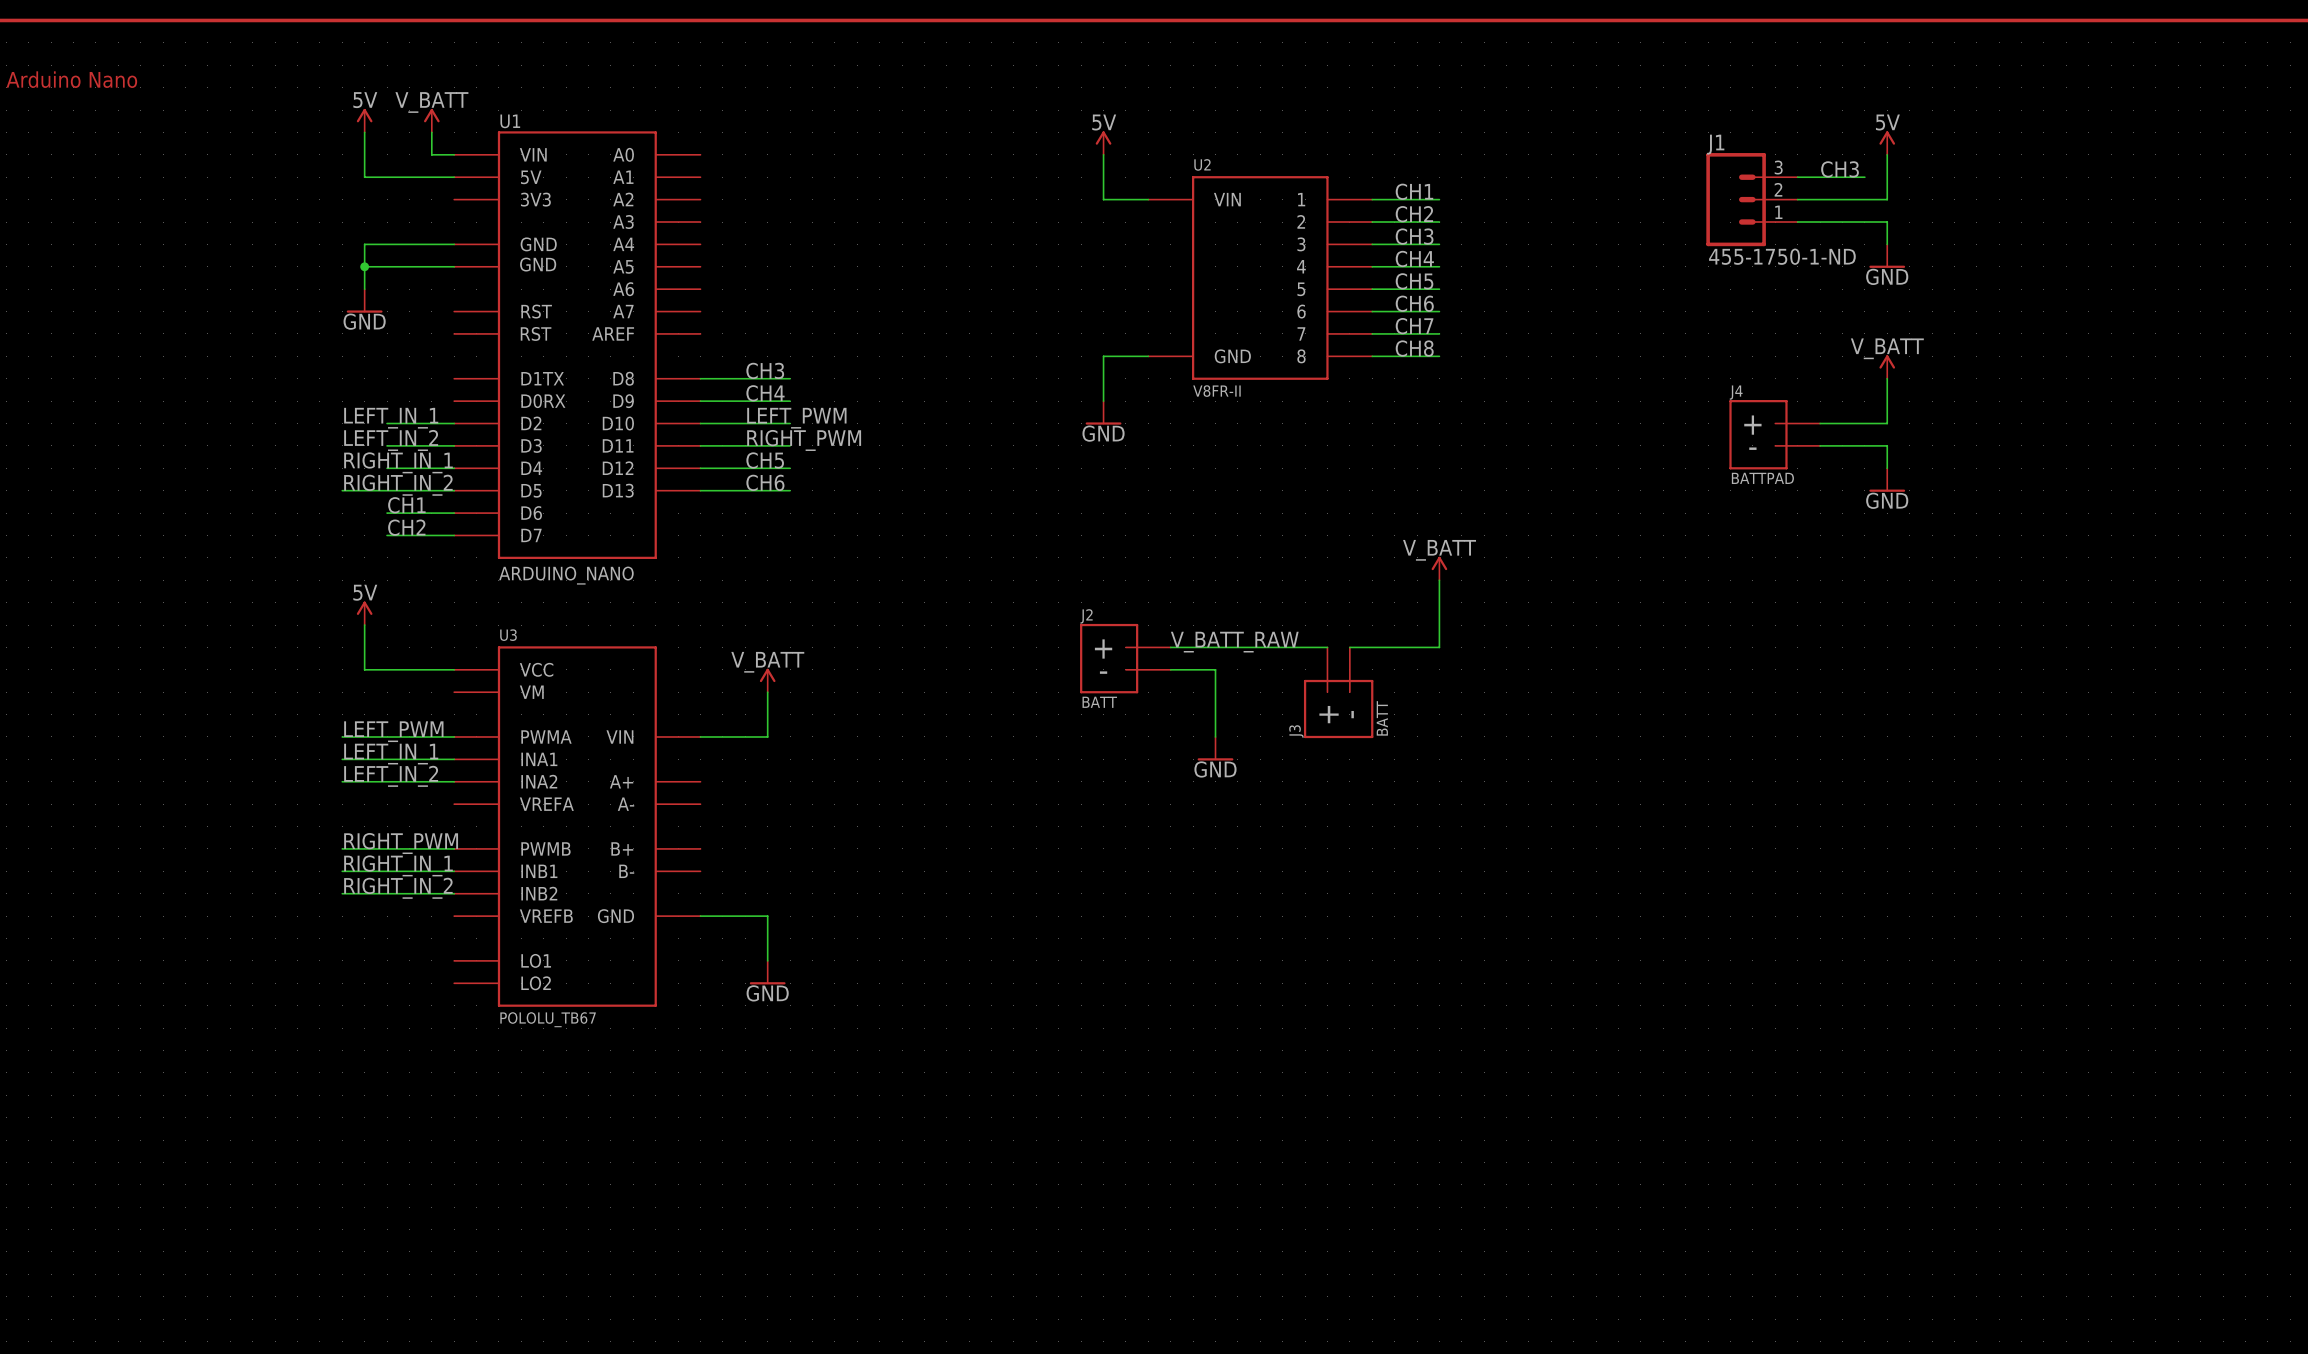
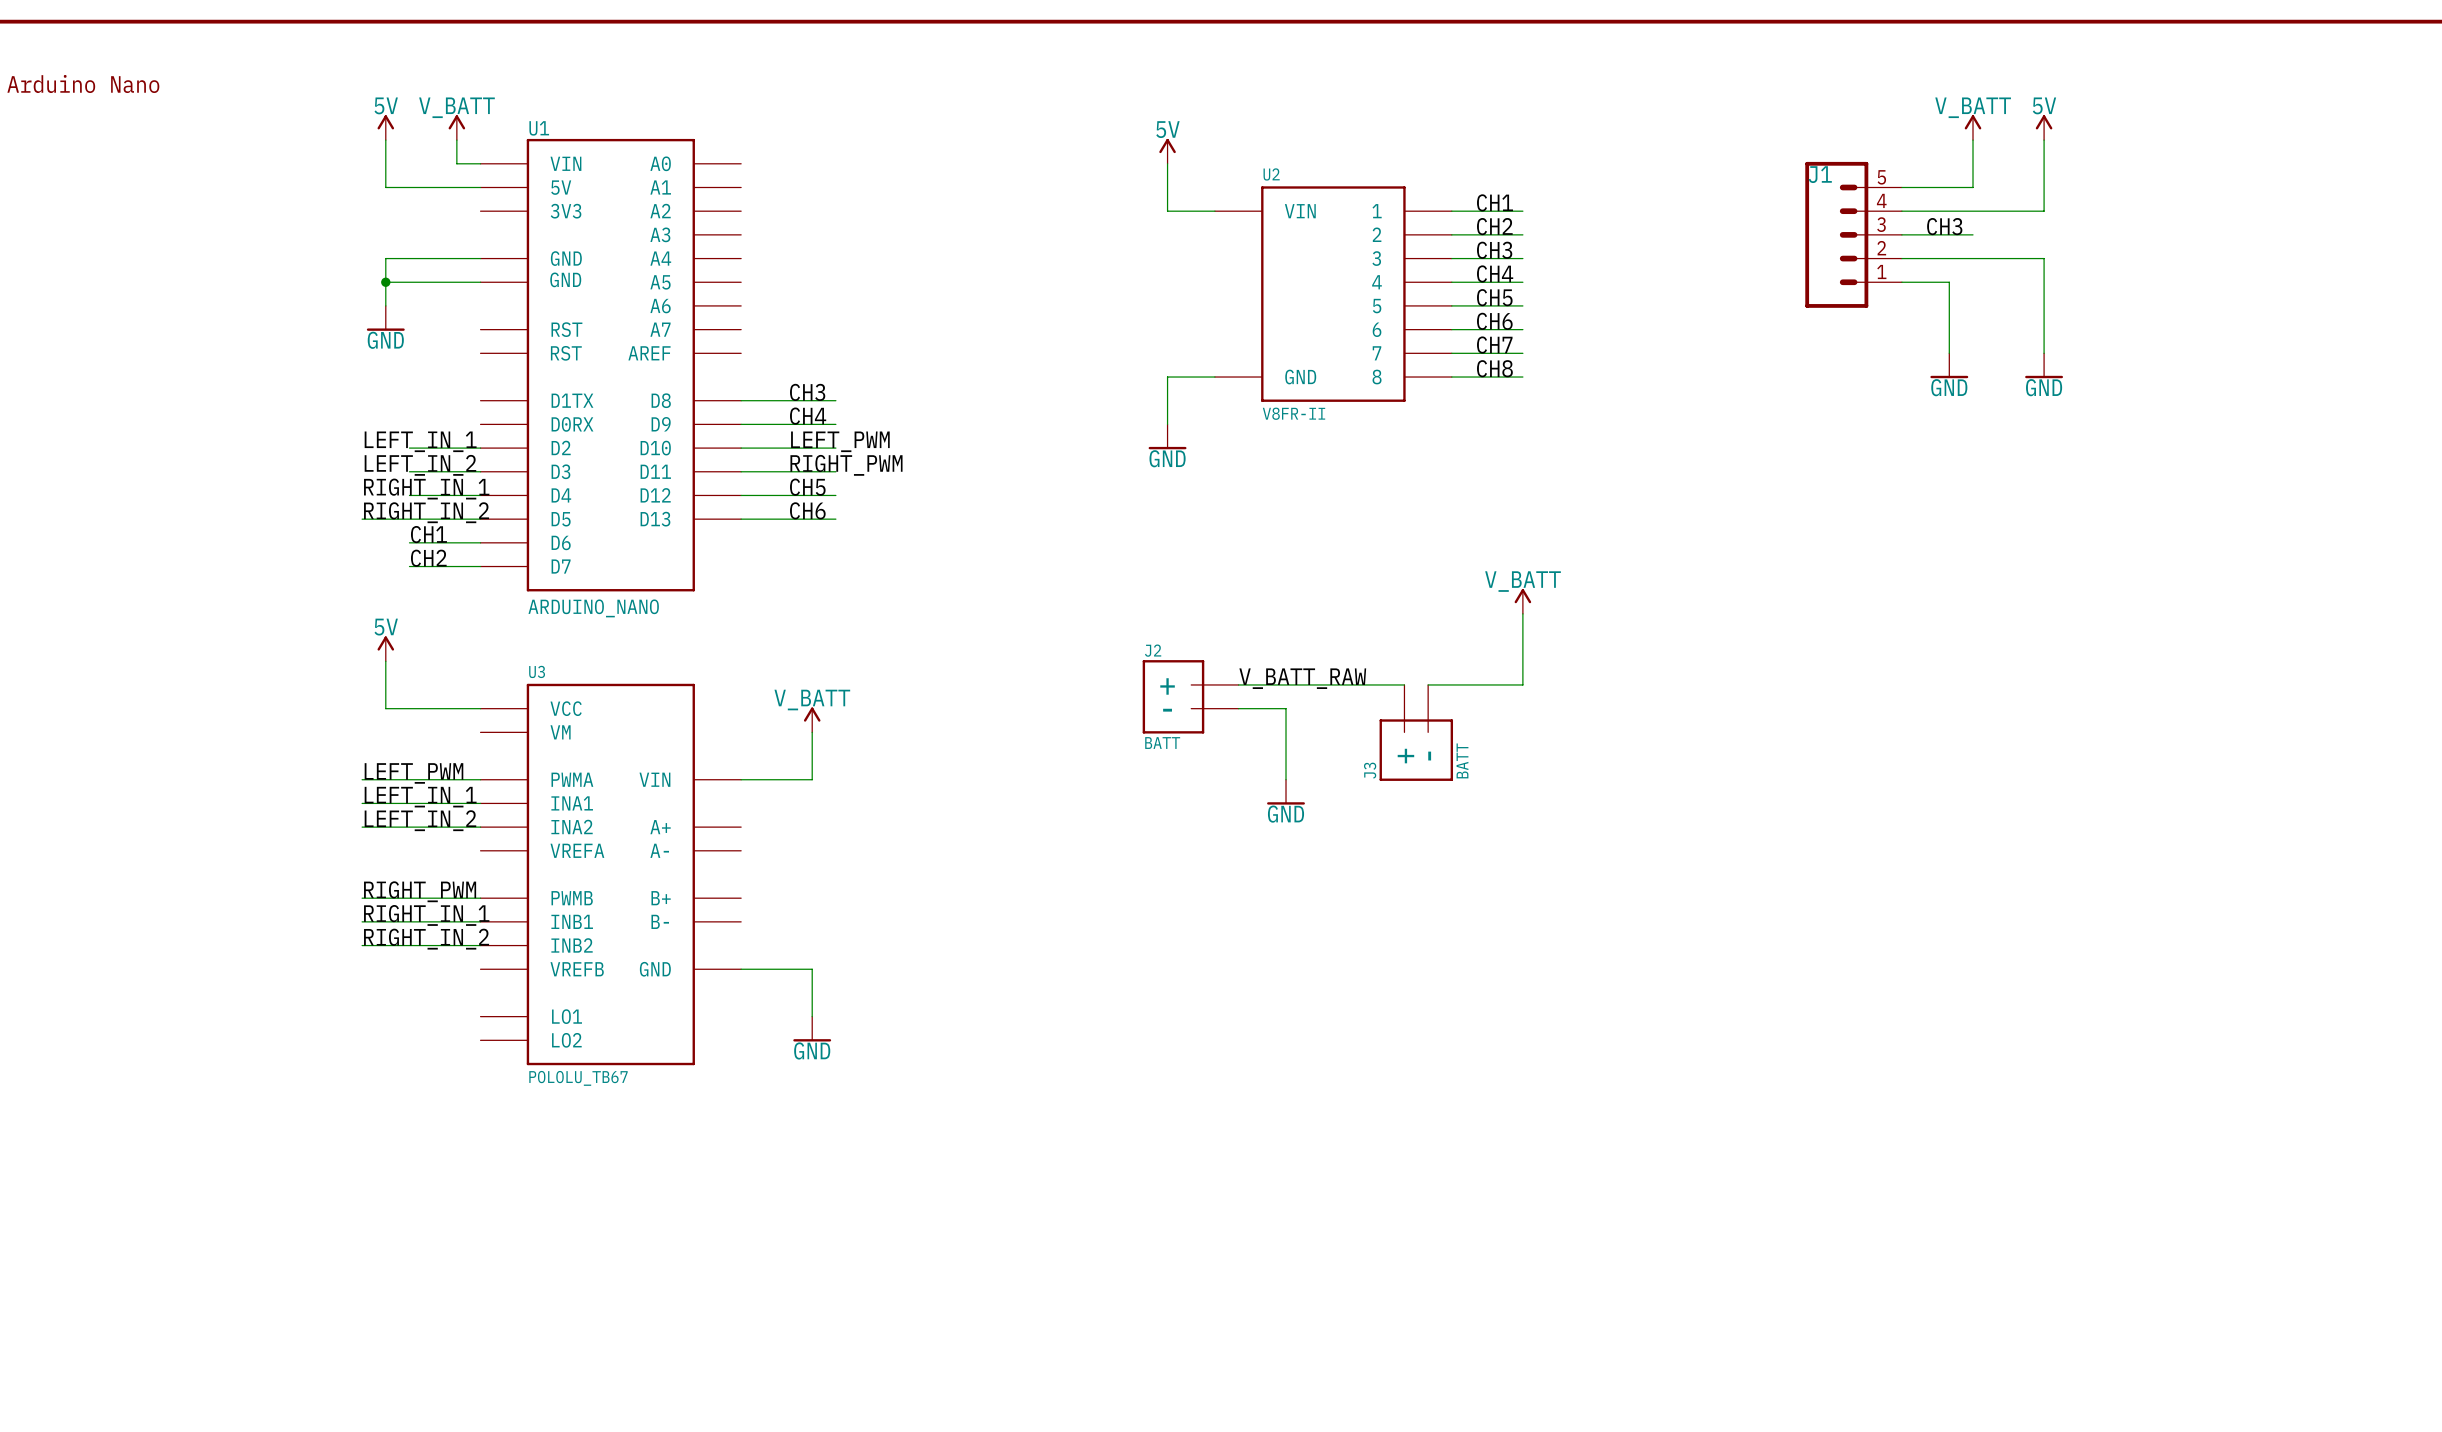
power symbol: none -> V_BATT (1973, 127)
wire: none -> (1973, 140) (1973, 187)
power symbol position: 5V (1887, 143) -> 5V (2044, 127)
J1 symbol: [1706, 153, 1798, 247] -> [1805, 161, 1902, 308]
wire: (1887, 154) (1887, 199) -> (2044, 140) (2044, 211) (1996, 211)
label position: CH3 (1840, 169) -> CH3 (1944, 226)
wire: (1864, 222) (1887, 222) (1887, 244) -> none
wire: none -> (1901, 258) (2044, 258) (2044, 353)
J1 value: 455-1750-1-ND (1782, 256) -> none
power symbol: GND (1887, 256) -> none
wire: none -> (1901, 282) (1949, 282) (1949, 353)
power symbol: none -> GND (1949, 365)
power symbol: none -> GND (2044, 365)
power symbol: V_BATT (1887, 366) -> none
wire: (1887, 378) (1887, 423) (1820, 423) -> none
J4: BATTPAD (1774, 434) -> none
wire: (1820, 445) (1887, 445) (1887, 468) -> none
power symbol: GND (1887, 480) -> none

